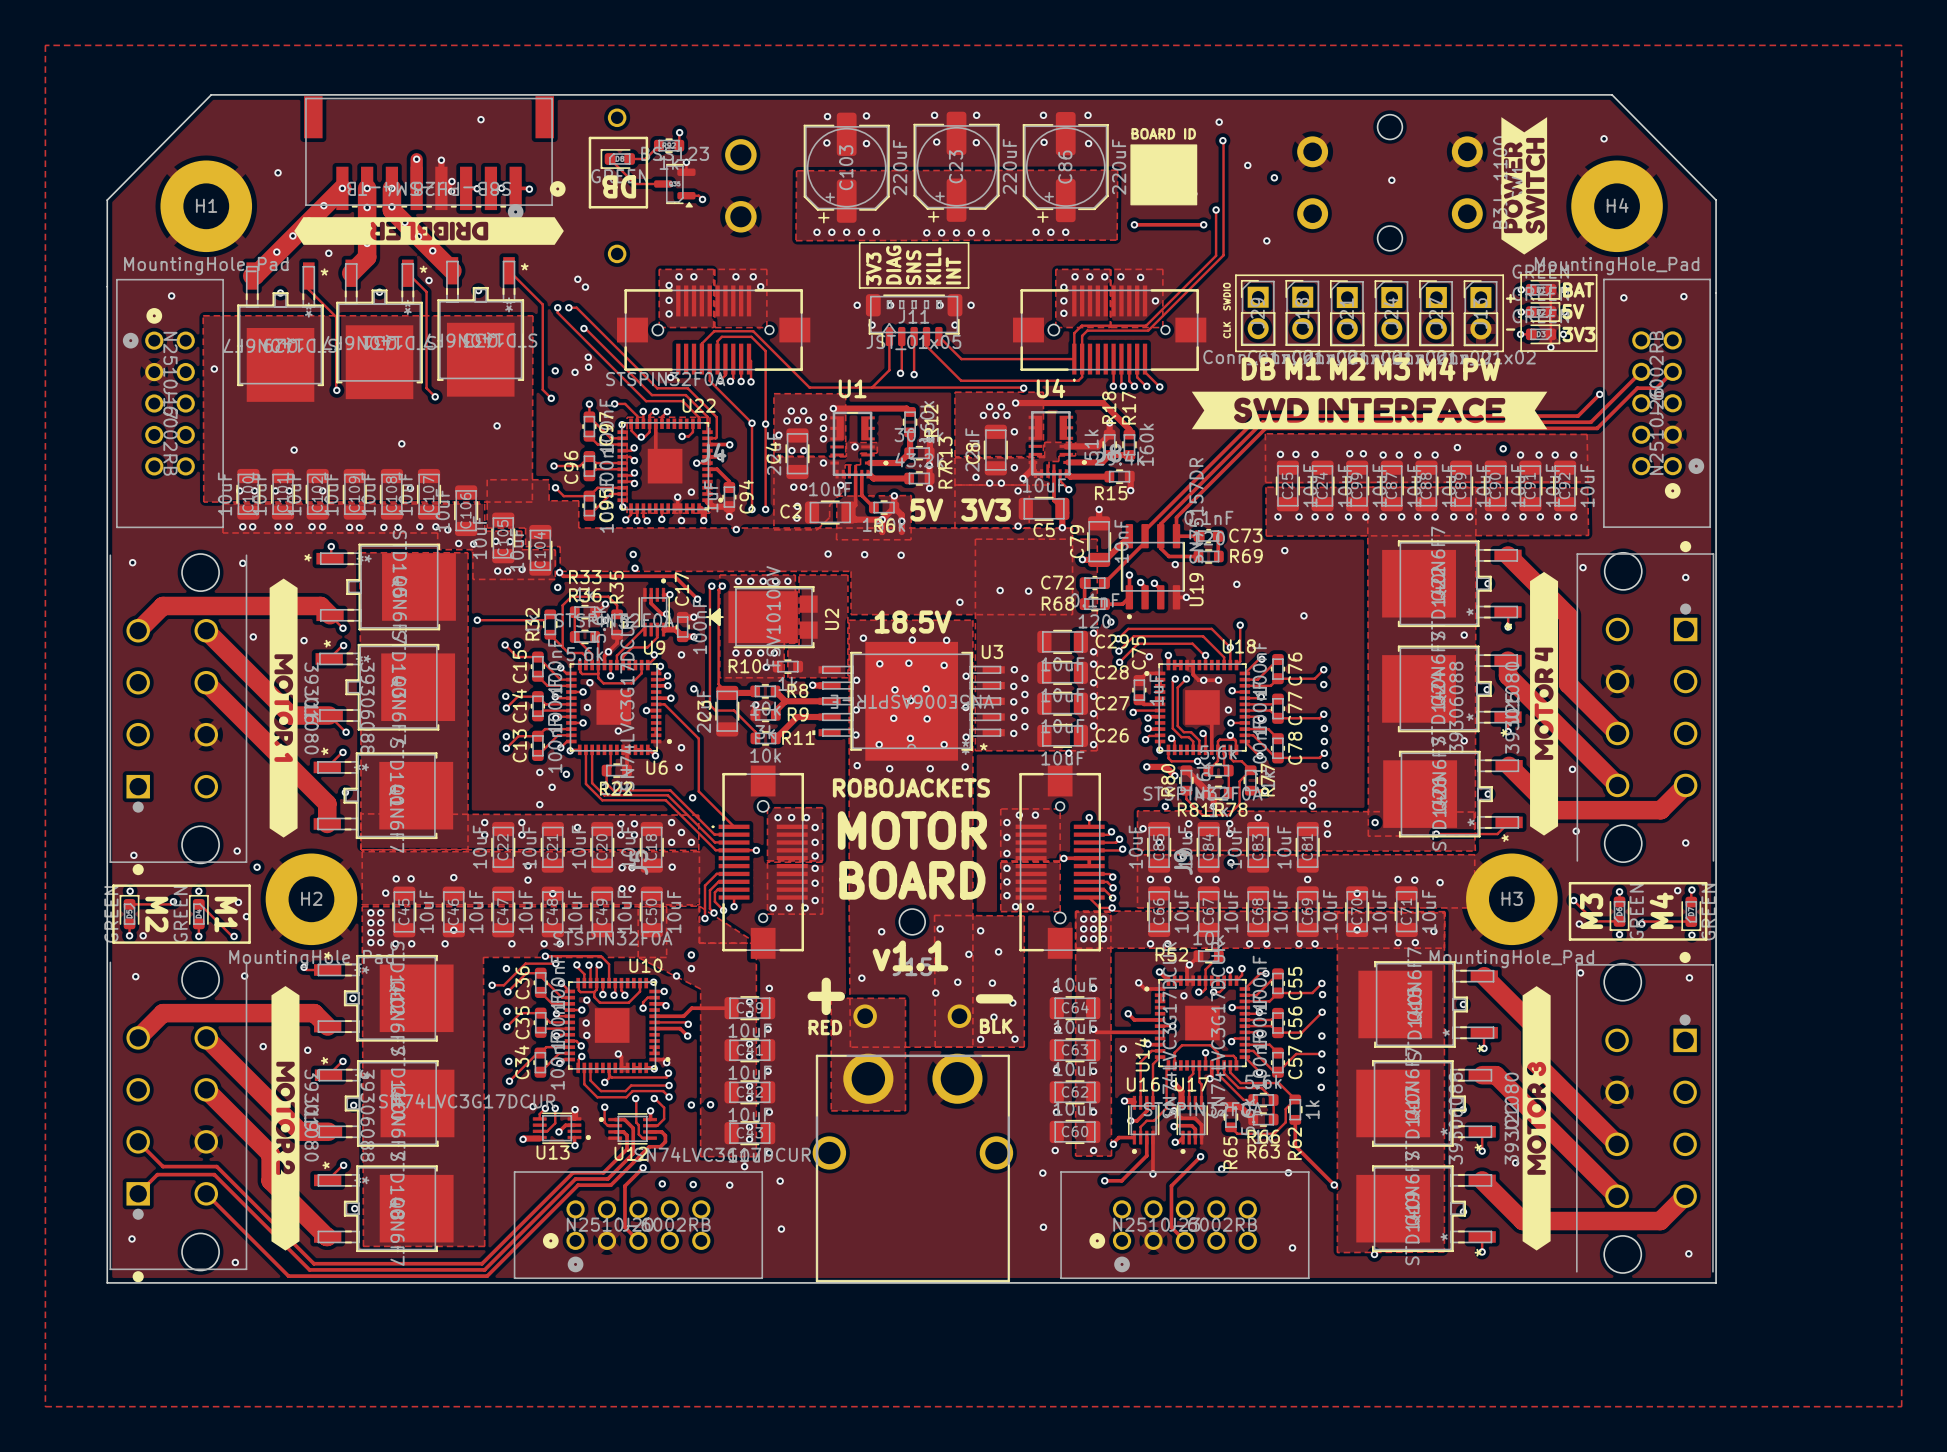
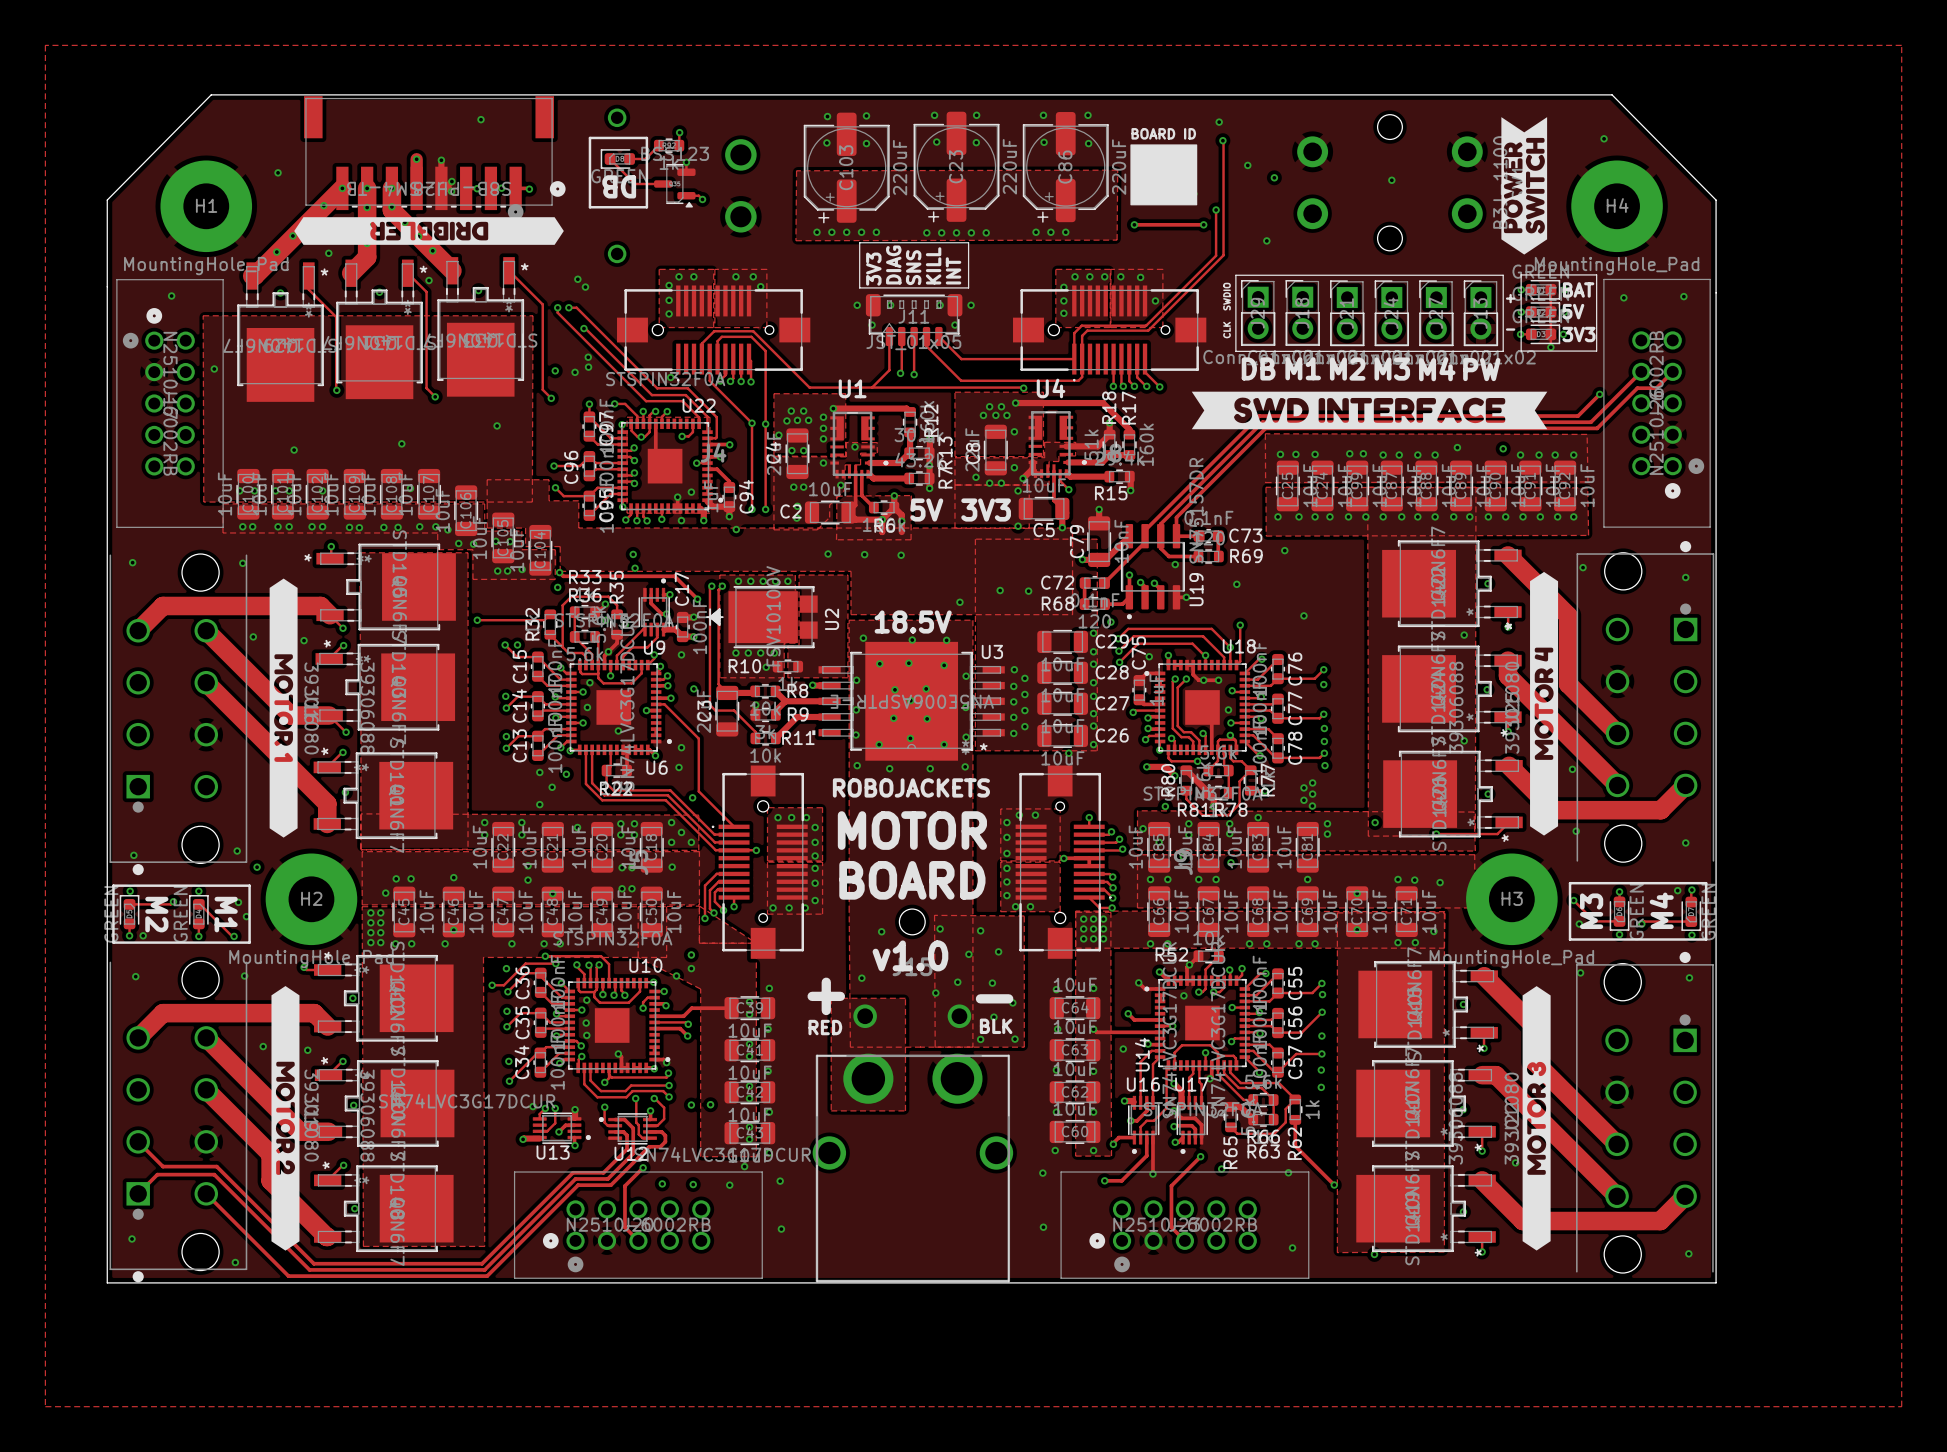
text: v1.1 (910, 955) -> v1.0 (910, 955)

